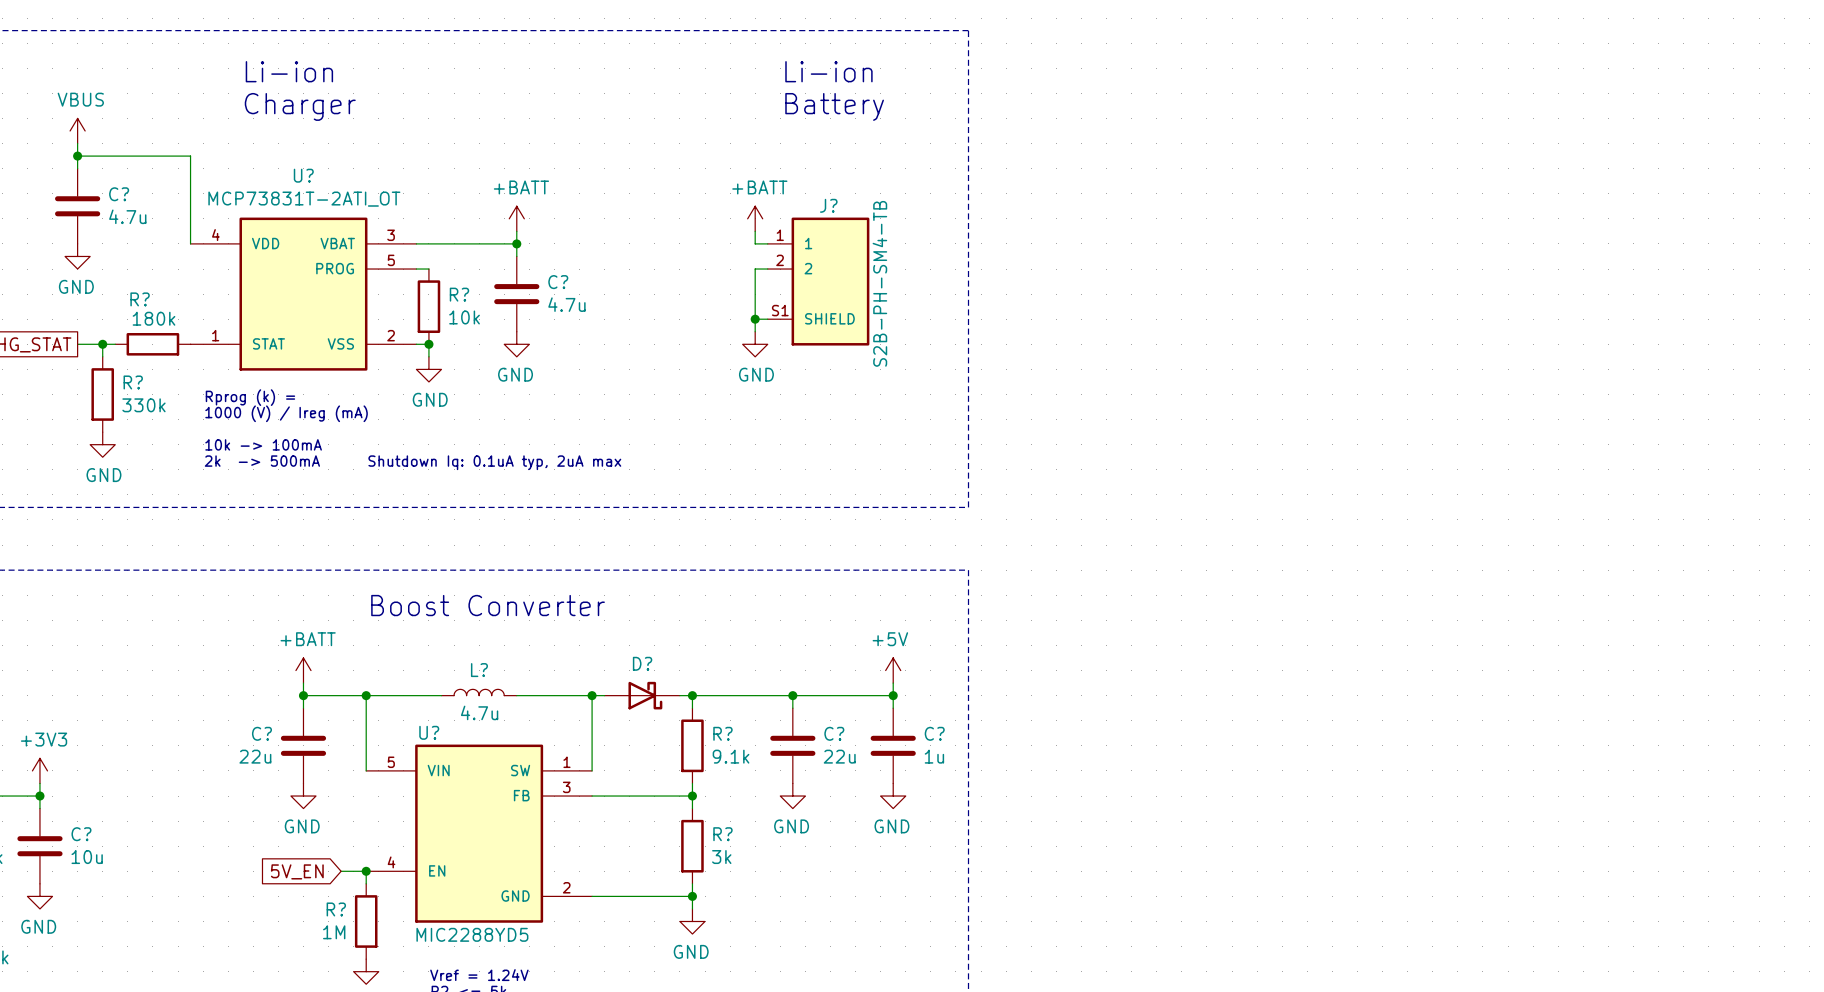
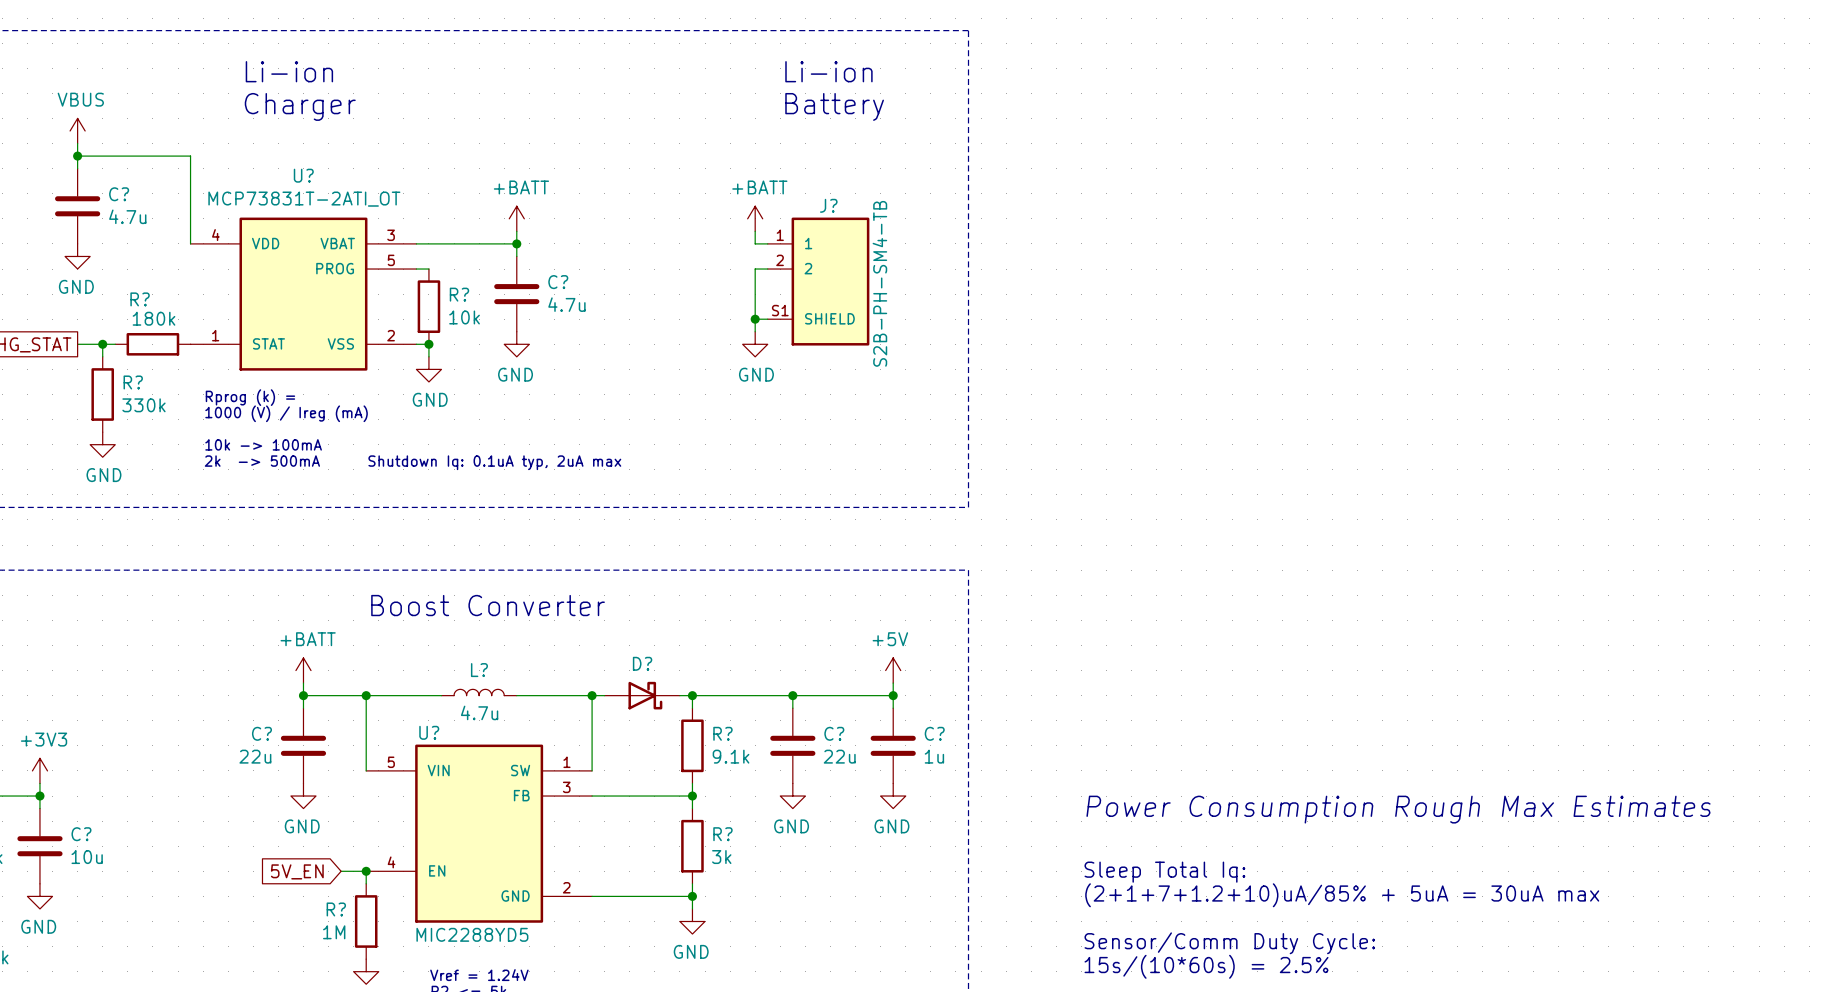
text: none -> Power Consumption Rough Max Estimates (1398, 809)
text: none -> Sleep Total Iq: (1164, 872)
text: none -> (2+1+7+1.2+10)uA/85% + 5uA = 30uA max (1342, 895)
text: none -> Sensor/Comm Duty Cycle: (1229, 943)
text: none -> 15s/(10*60s) = 2.5% (1206, 966)

